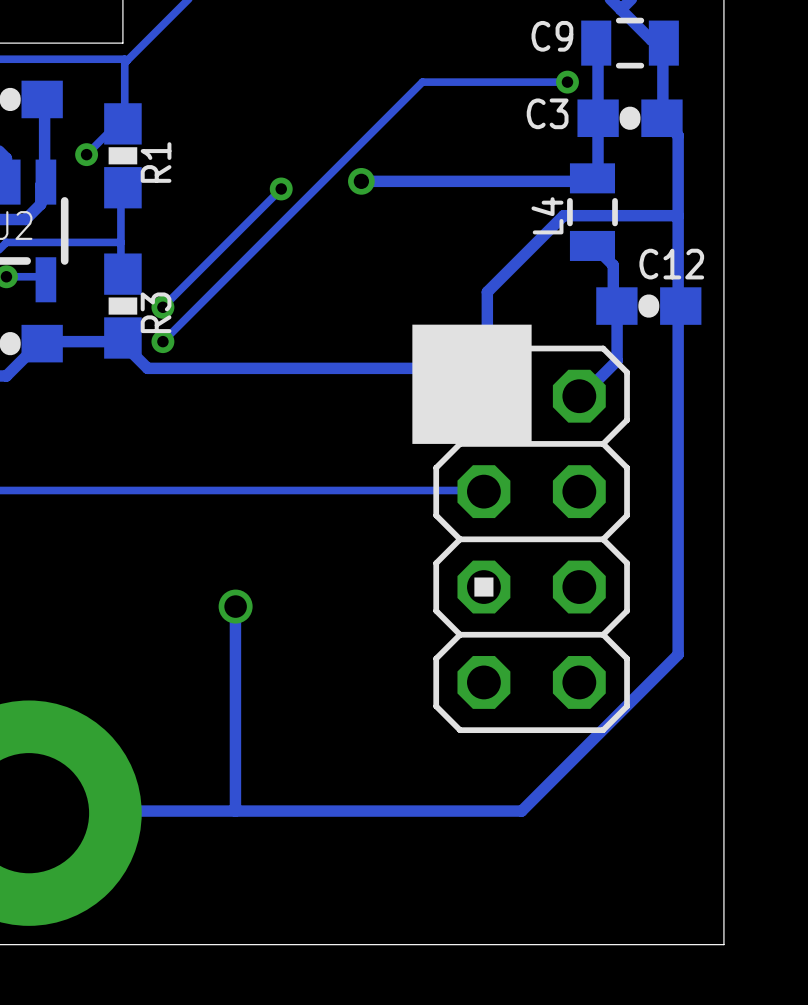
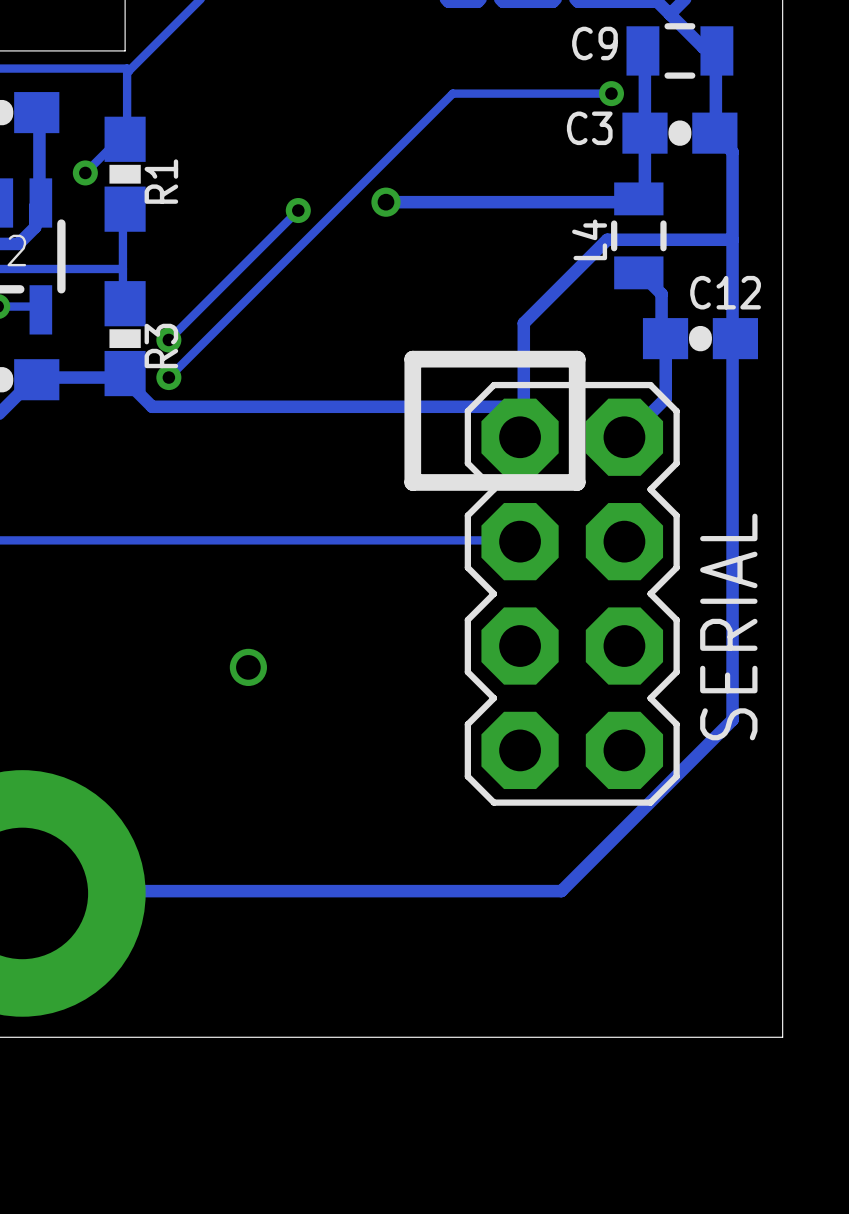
line: none -> (577, 359) (577, 482) (412, 482) (412, 359) (577, 359)
part: (521, 528) -> none
SERIAL: none -> (572, 593)
track: (235, 606) (235, 811) -> none

